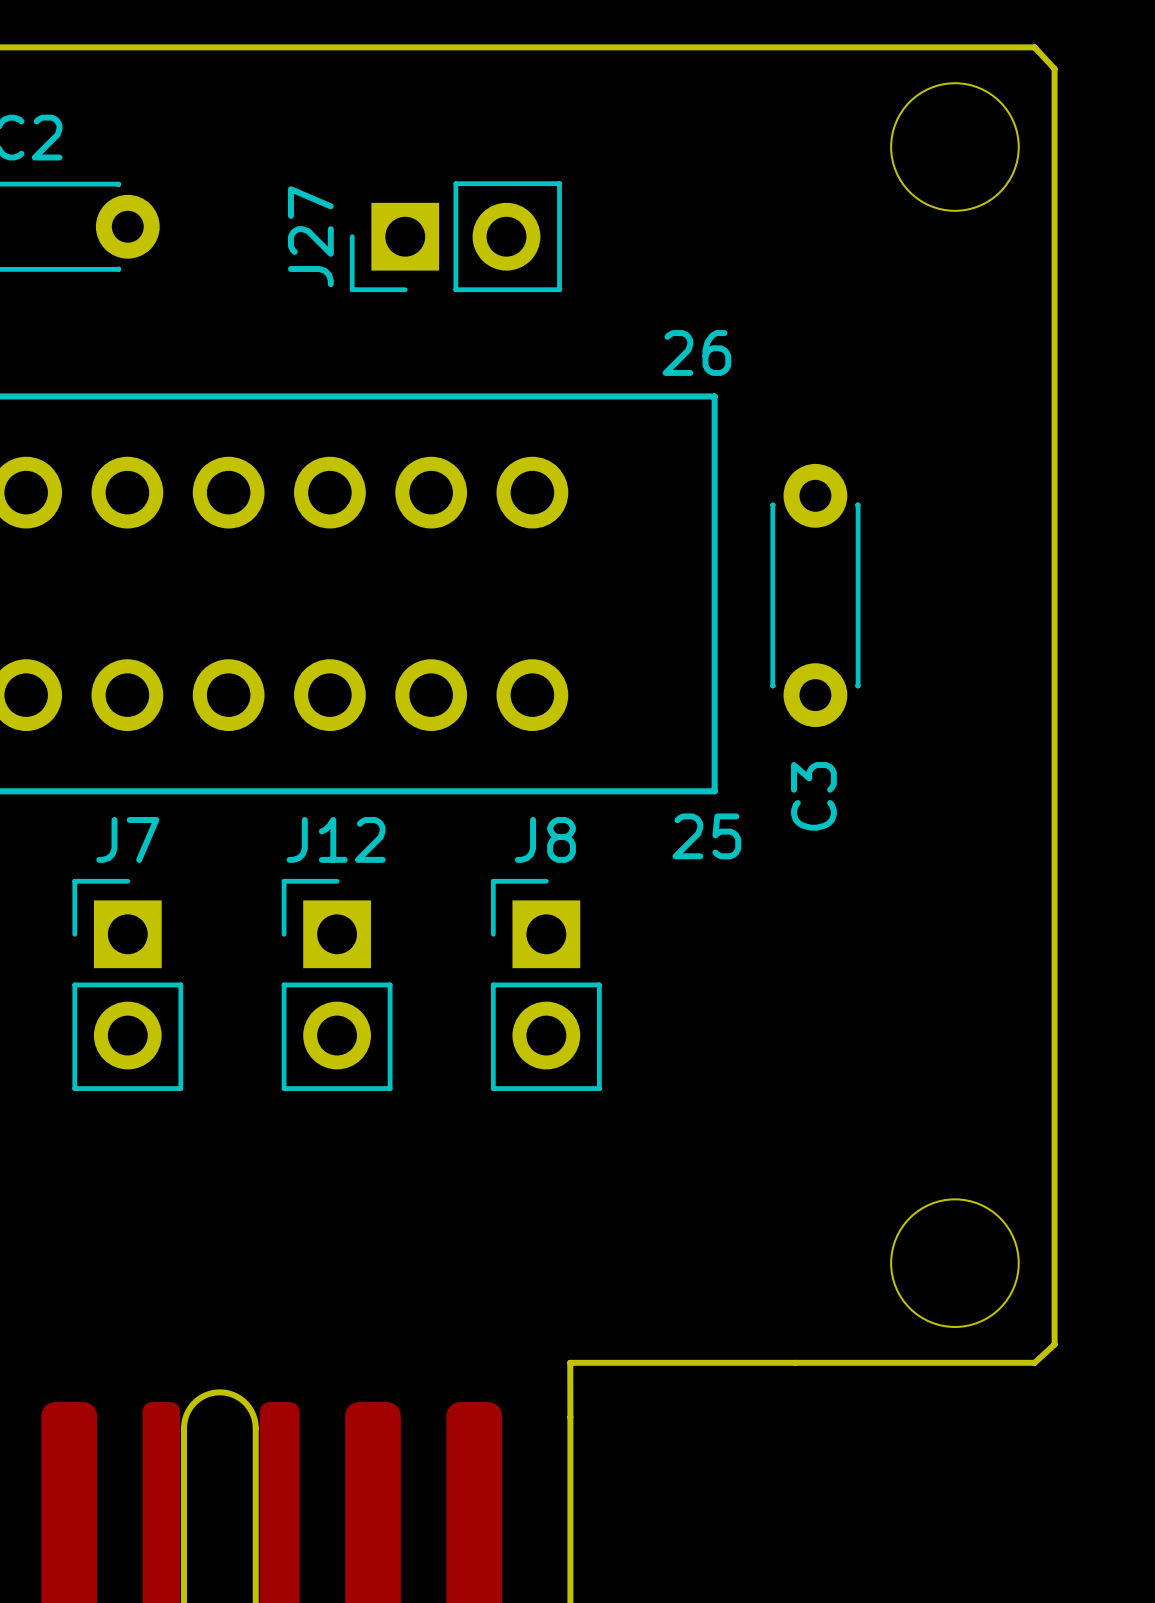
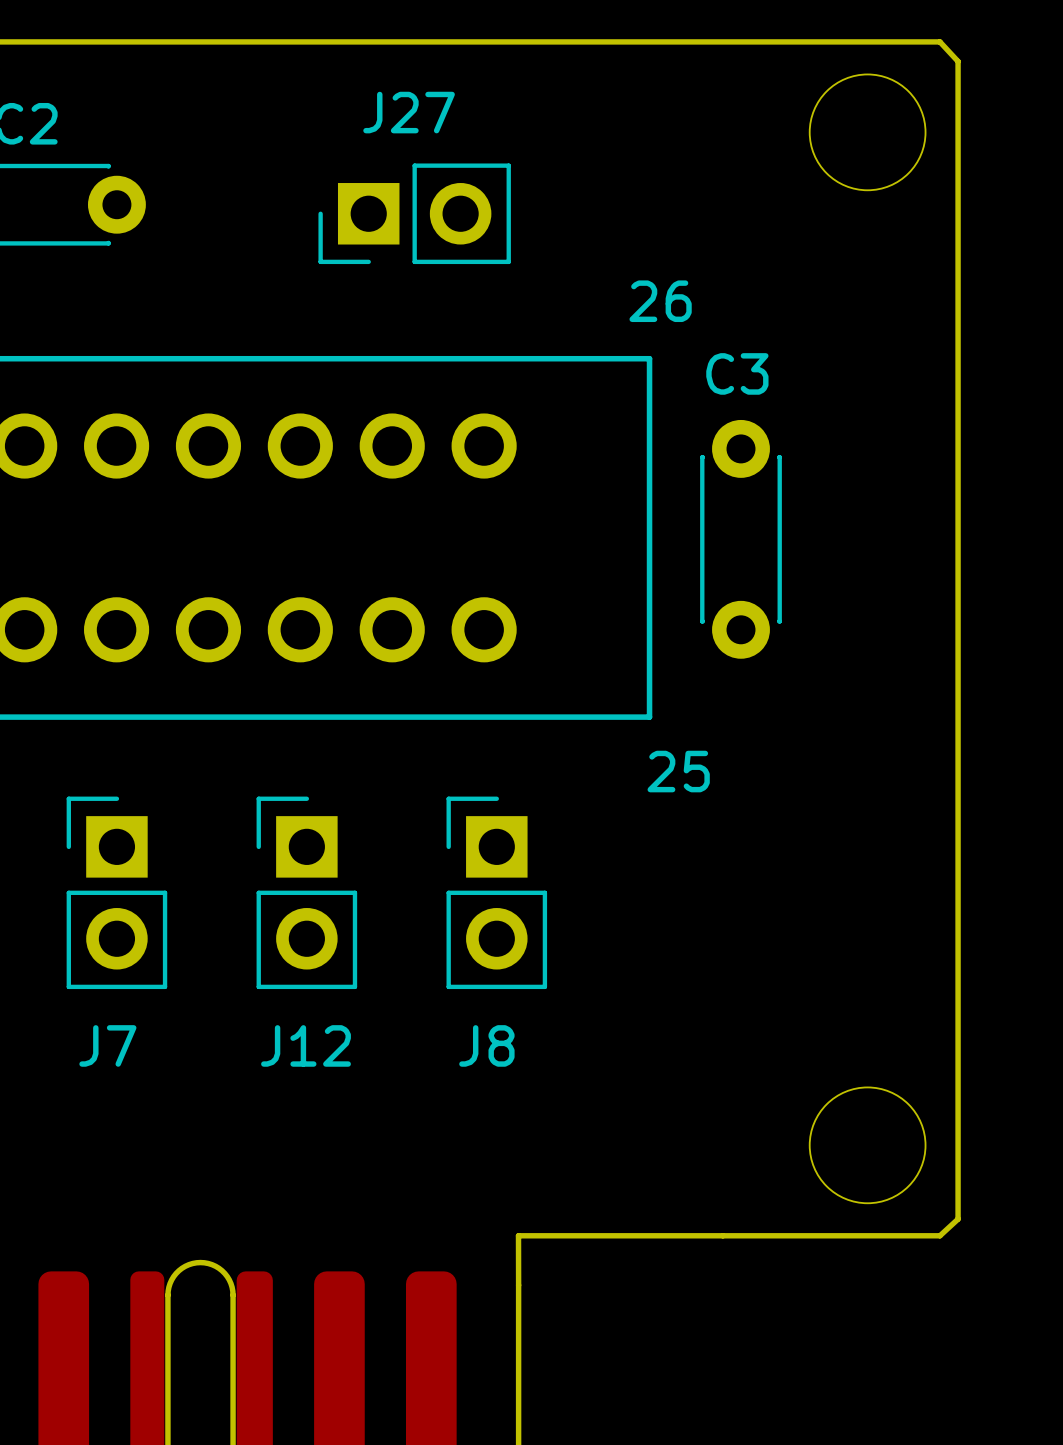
J27 name rotation: 0° (310, 236) -> 90° clockwise (409, 112)
J27 name position: J27 (310, 236) -> J27 (409, 112)
part text position: 26 (696, 353) -> 26 (660, 301)
C3 name rotation: 0° (813, 796) -> 90° clockwise (737, 373)
C3 name position: C3 (813, 796) -> C3 (737, 373)
part text position: 25 (706, 836) -> 25 (678, 771)
J7 name position: J7 (127, 839) -> J7 (107, 1045)
J12 name position: J12 (336, 839) -> J12 (306, 1045)
J8 name position: J8 (545, 839) -> J8 (486, 1045)

